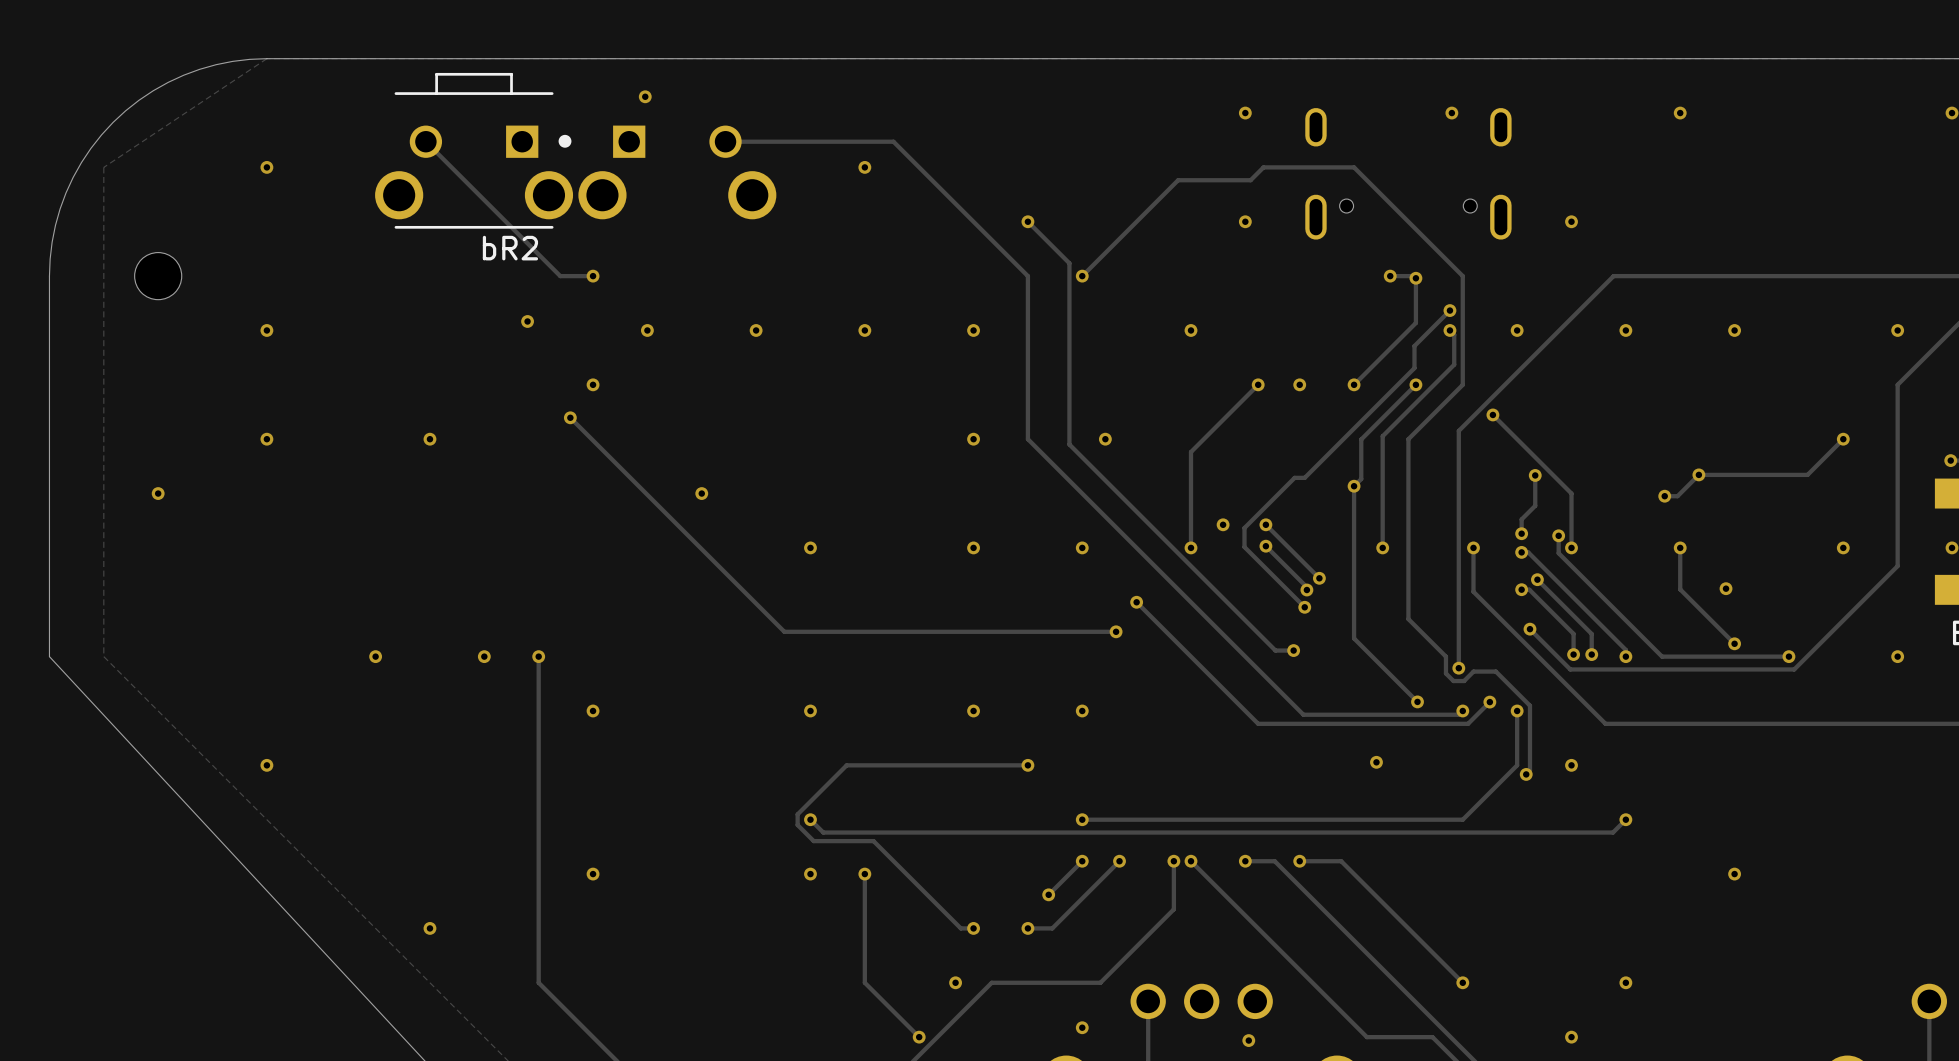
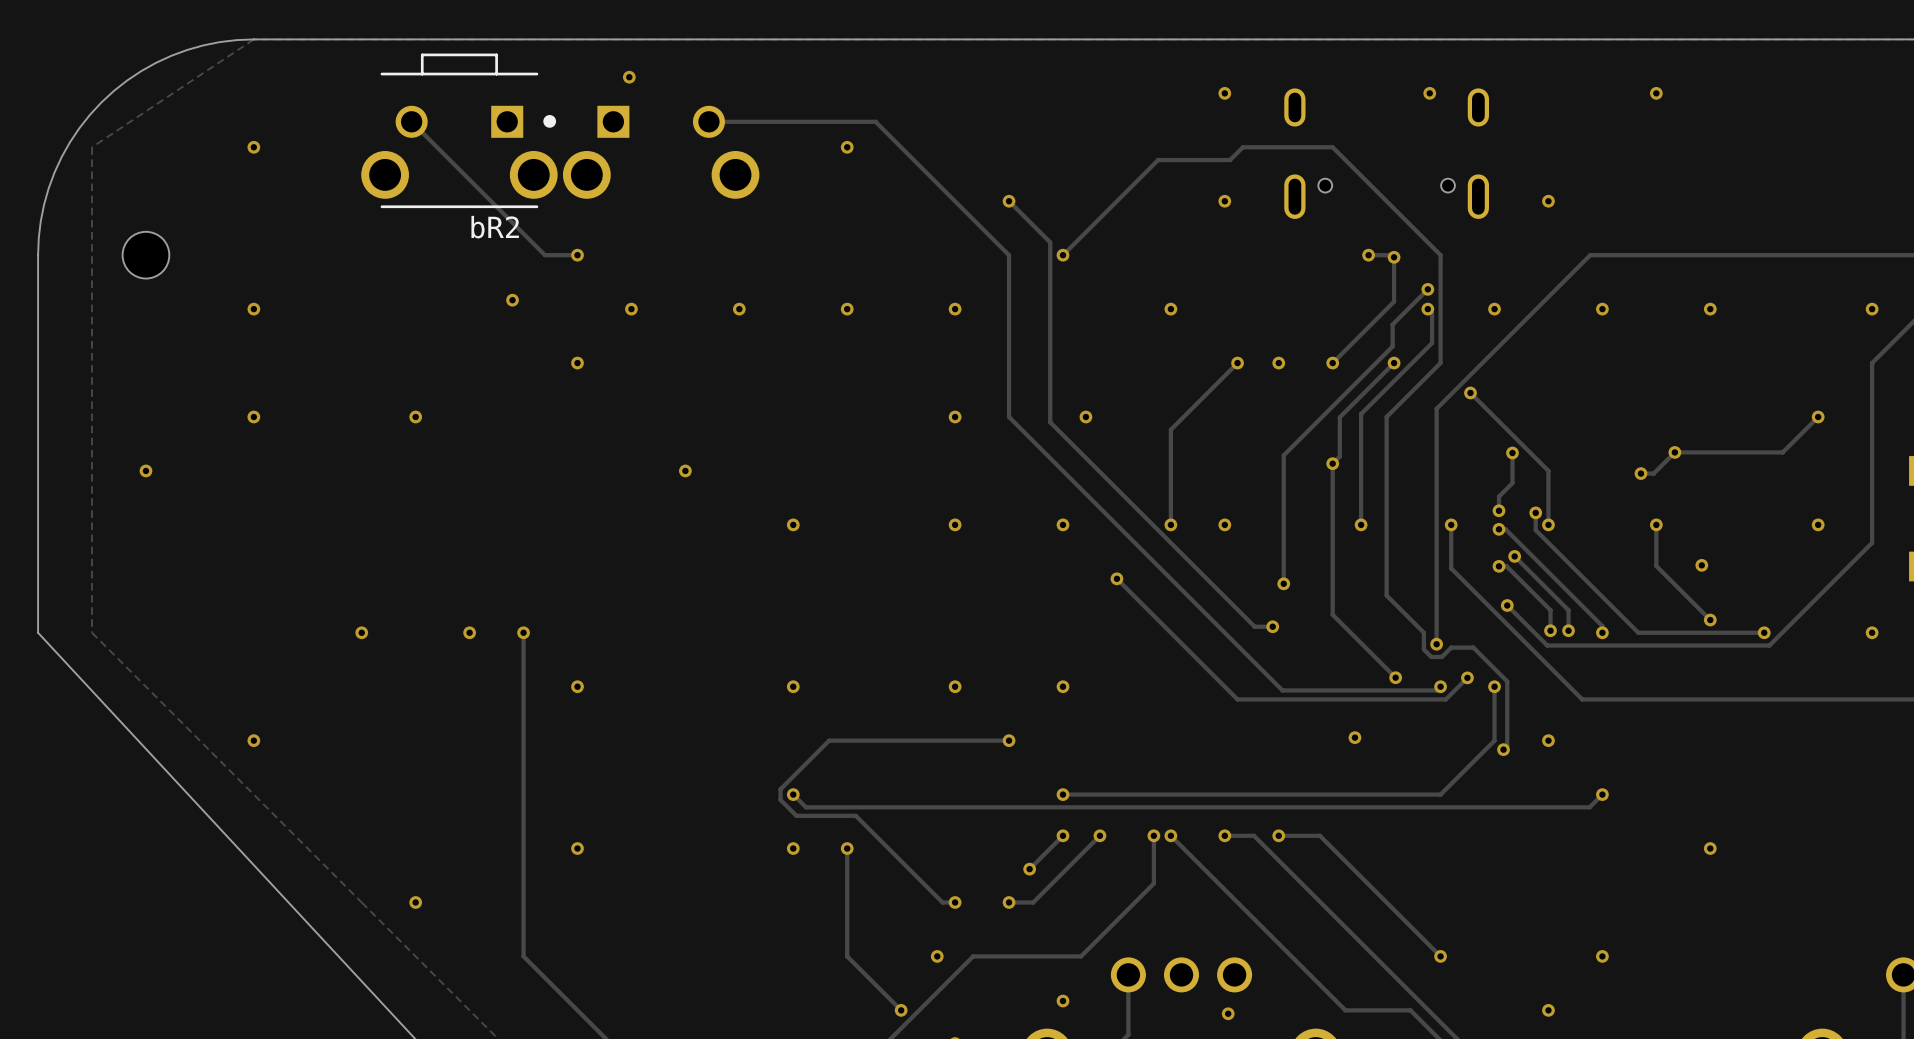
track: (570, 417) (784, 631) (1116, 631) -> none
via: (570, 417) -> none
track: (1304, 477) (1294, 477) (1244, 528) (1244, 547) (1304, 607) -> (1283, 455) (1283, 583)
via: (1223, 524) -> none
track: (1265, 524) (1319, 578) -> none
via: (1265, 524) -> none
track: (1265, 546) (1306, 587) (1306, 590) -> none
via: (1265, 546) -> none
via: none -> (1224, 524)
via: (1319, 578) -> none
via: (1306, 590) -> none
via: (1116, 631) -> none

